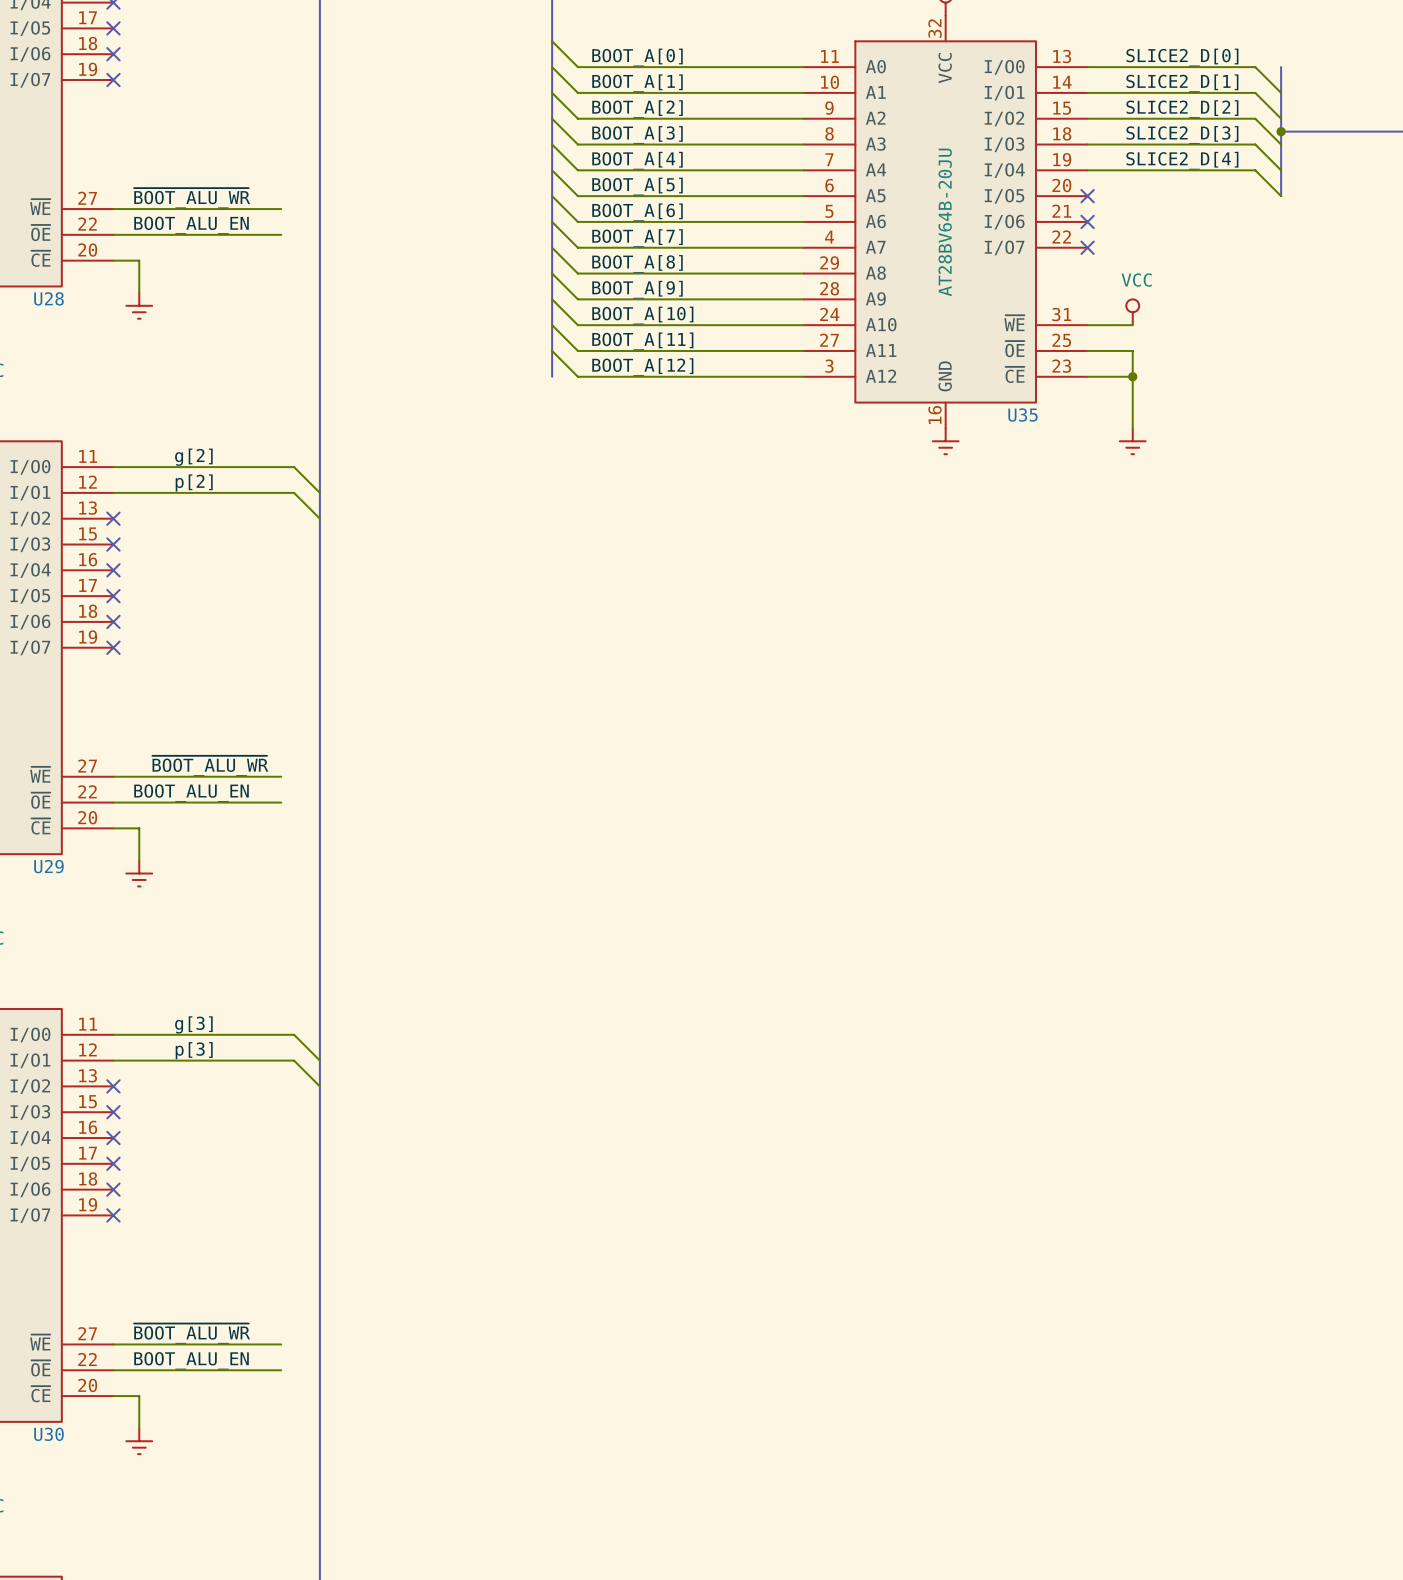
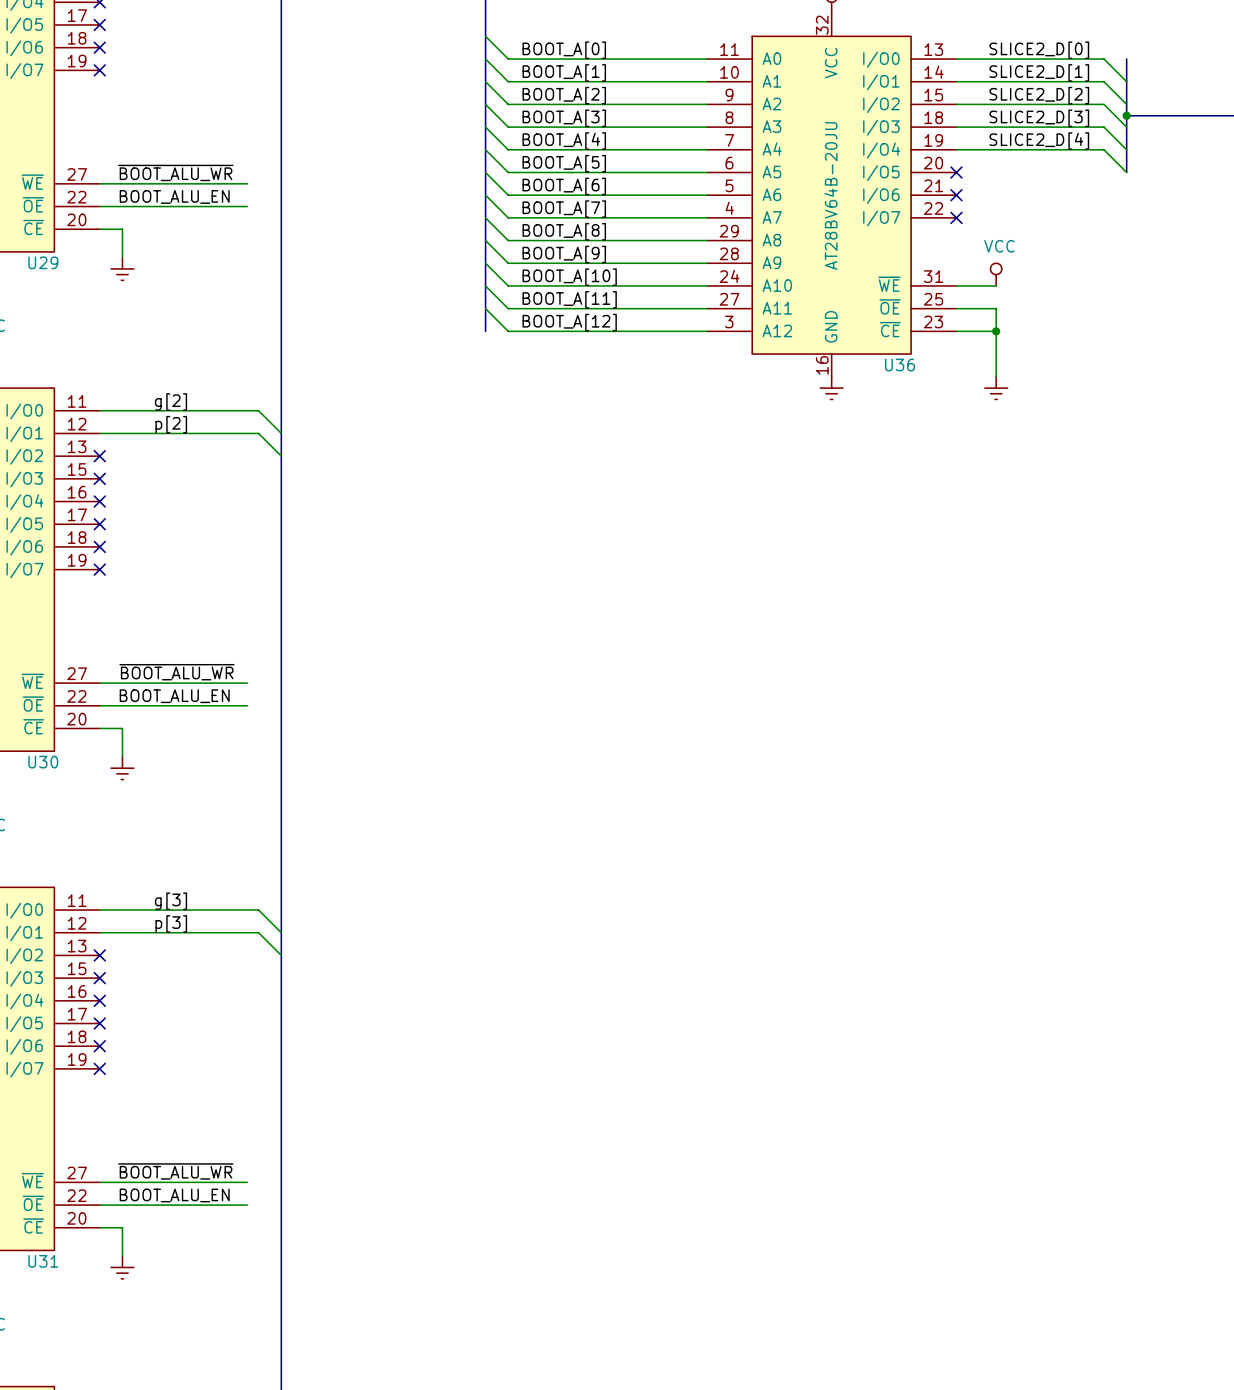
U28 name: U28 (49, 298) -> U29 (43, 262)
U35 name: U35 (1023, 415) -> U36 (899, 364)
U29 name: U29 (48, 866) -> U30 (43, 762)
U30 name: U30 (49, 1434) -> U31 (43, 1261)

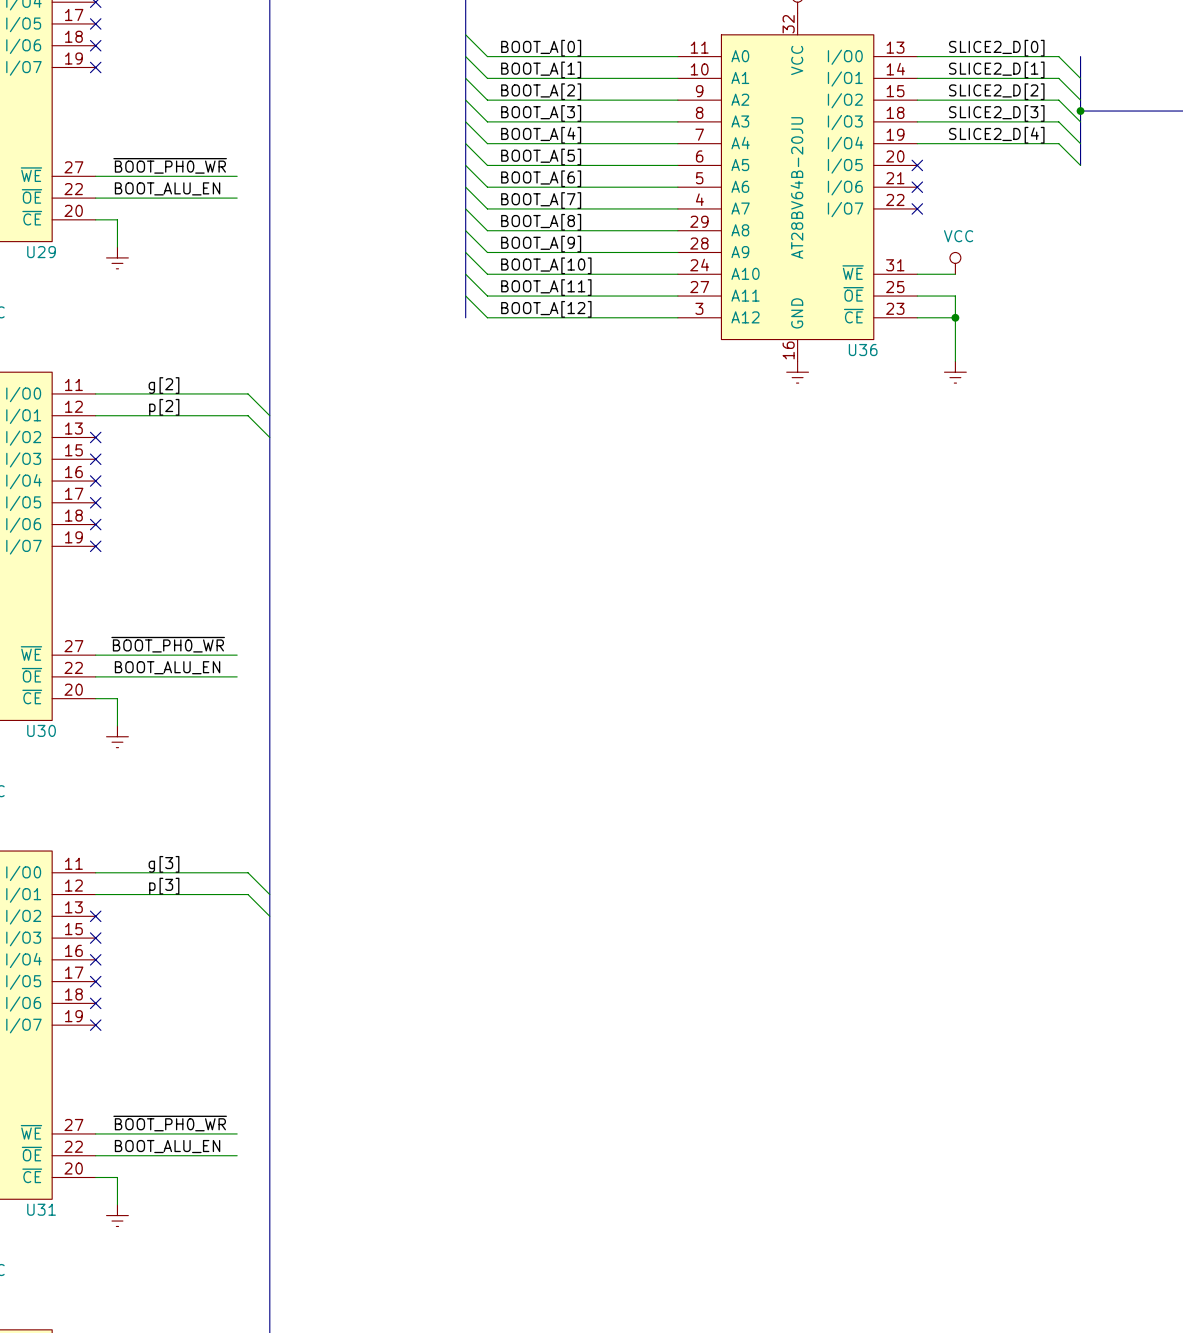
label: ~{BOOT_ALU_WR} (175, 172) -> ~{BOOT_PH0_WR} (170, 165)
label: ~{BOOT_ALU_WR} (176, 672) -> ~{BOOT_PH0_WR} (168, 644)
label: ~{BOOT_ALU_WR} (175, 1171) -> ~{BOOT_PH0_WR} (170, 1123)

